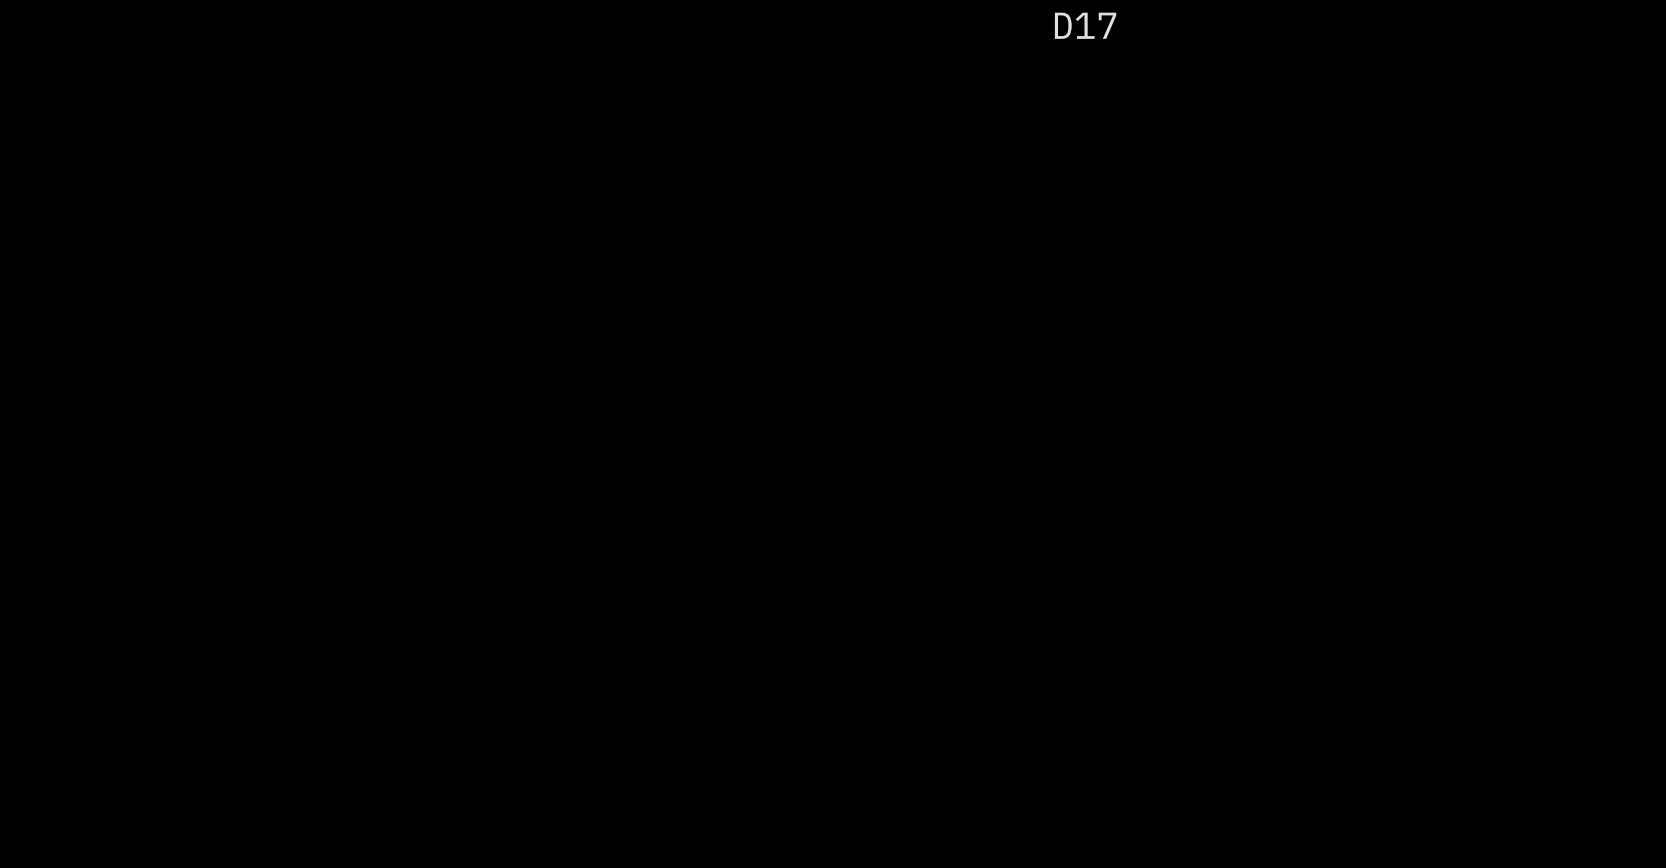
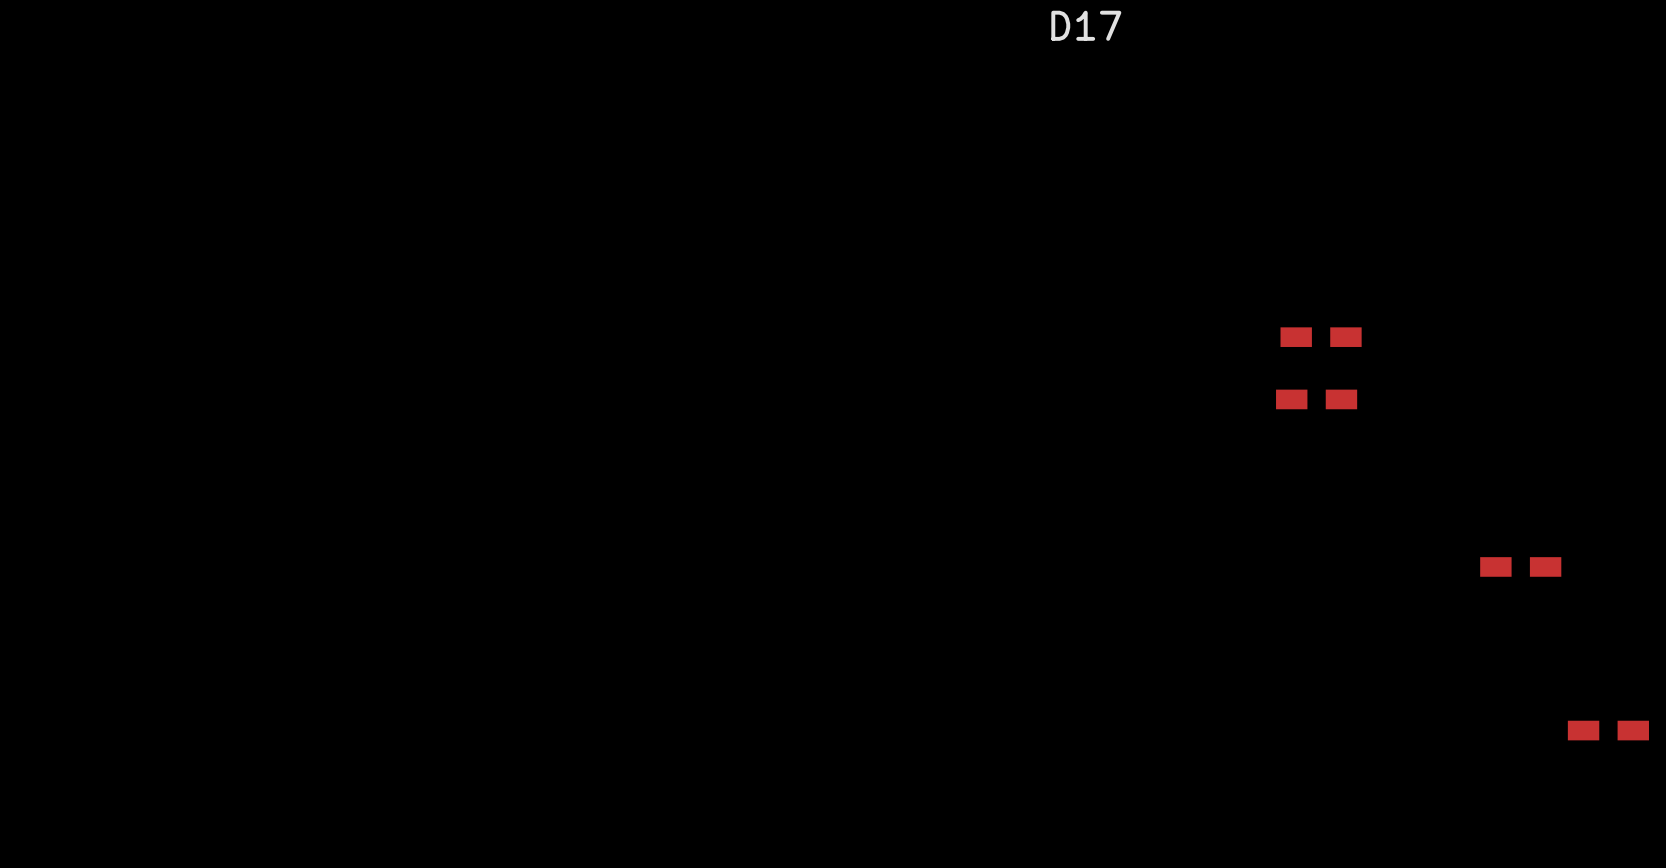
part: none -> (1321, 337)
part: none -> (1316, 399)
part: none -> (1520, 566)
part: none -> (1608, 730)

